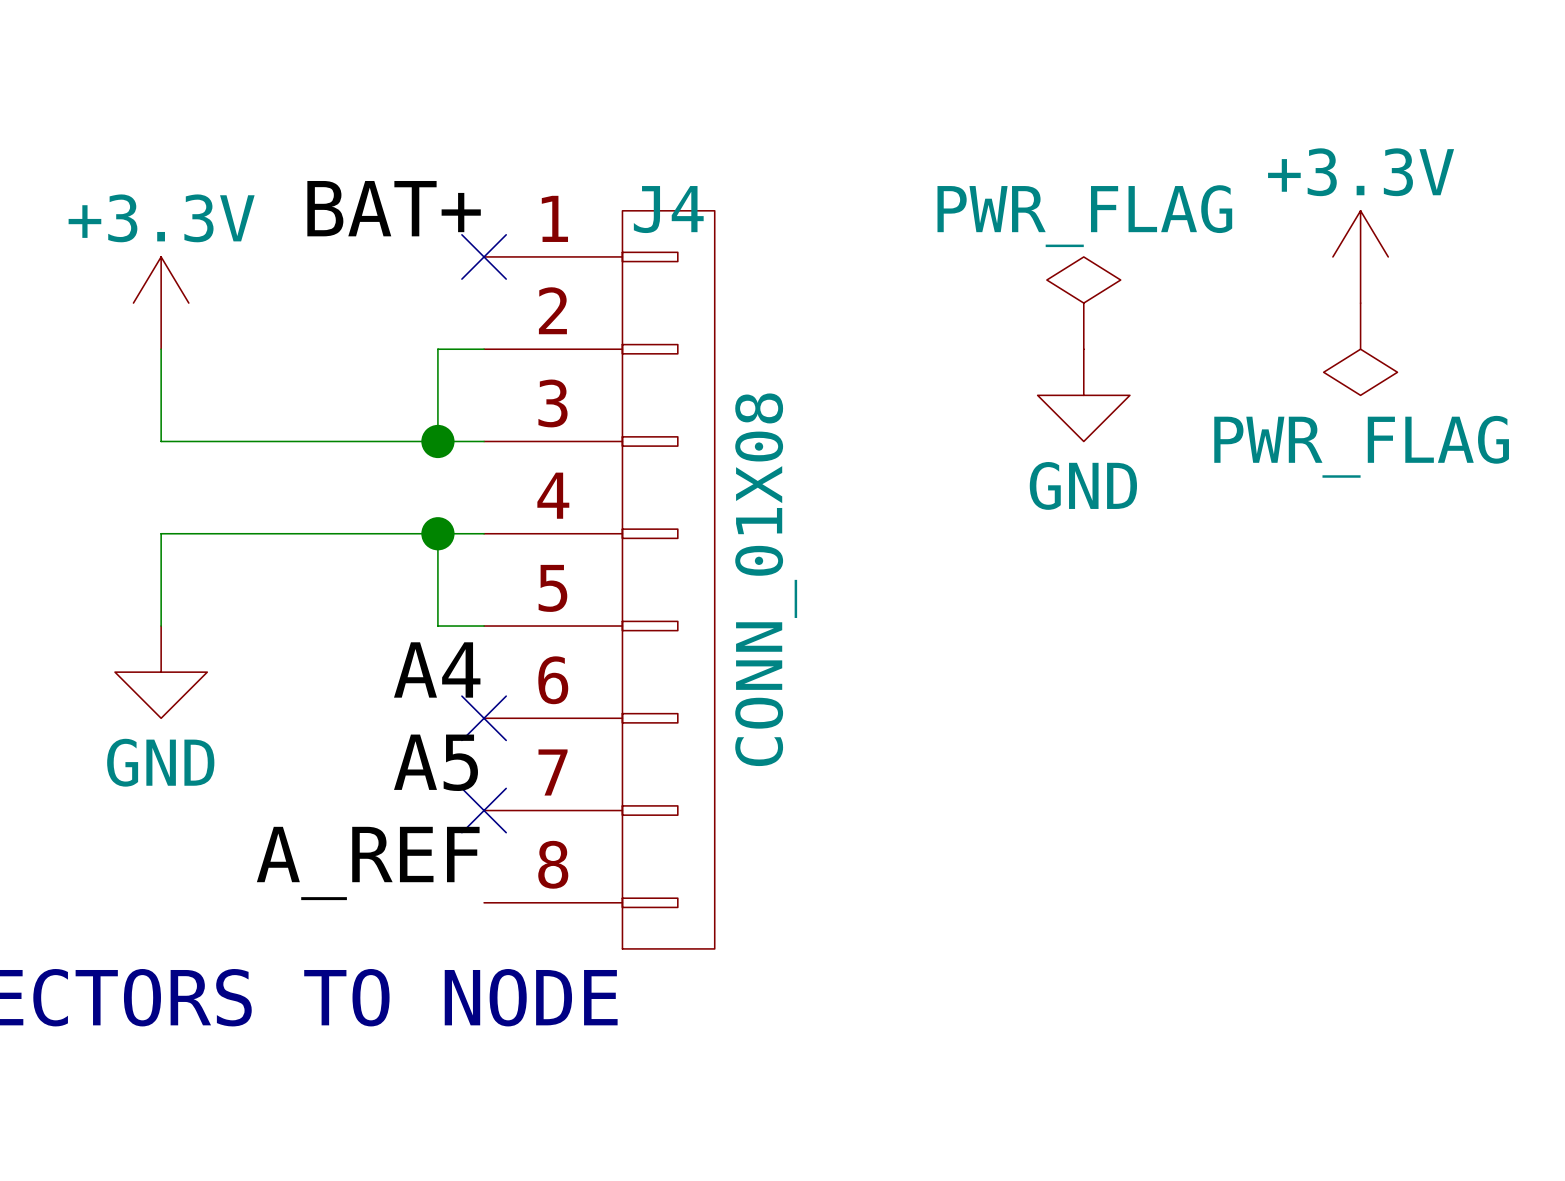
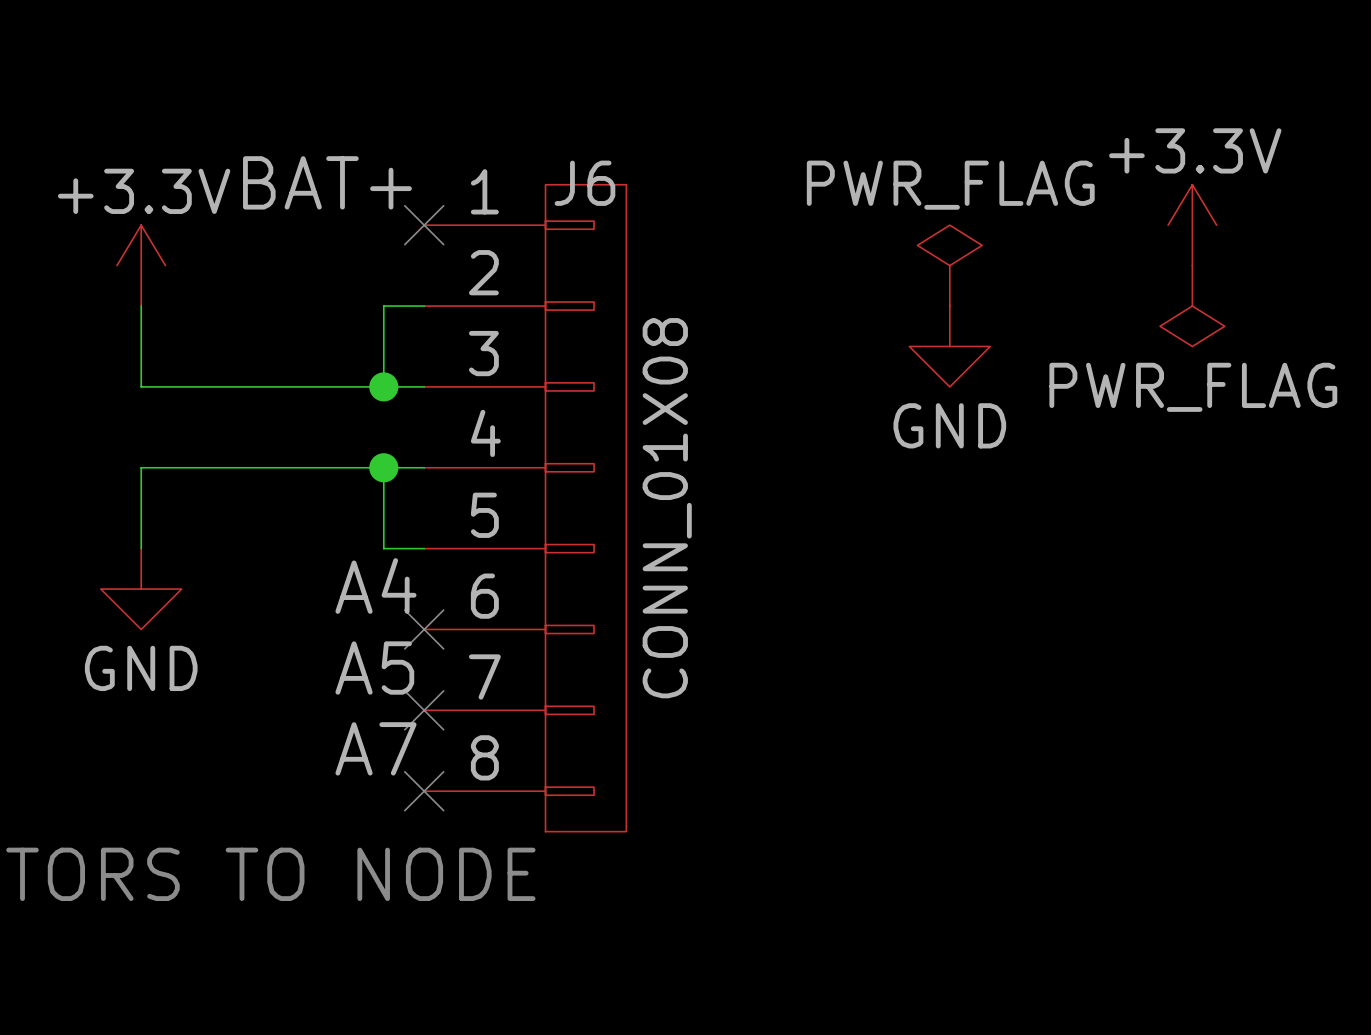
J4 name: J4 (668, 209) -> J6 (584, 183)
label: A_REF (368, 863) -> A7 (375, 748)
no-connect mark: none -> (424, 791)

